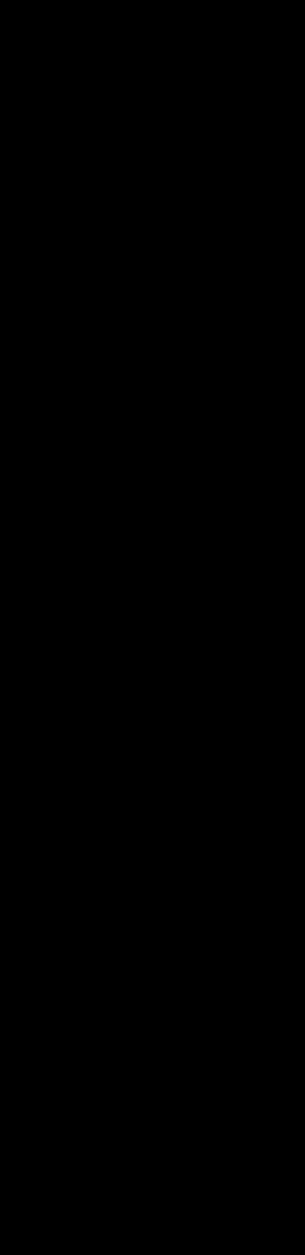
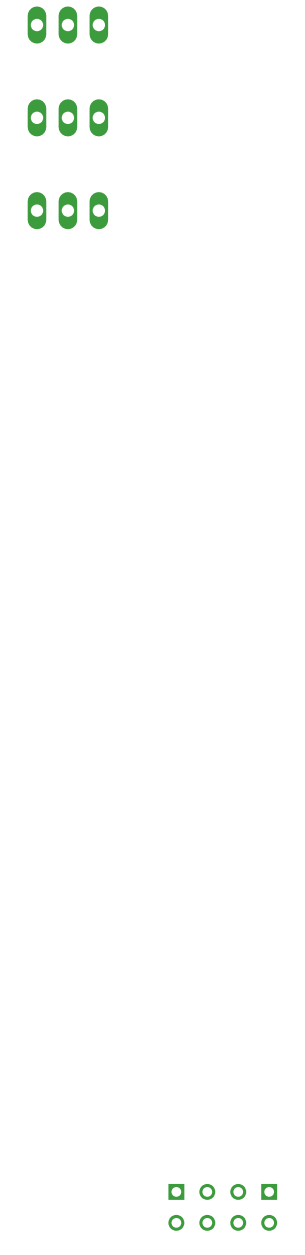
part: none -> (67, 25)
part: none -> (67, 117)
part: none -> (67, 210)
part: none -> (222, 1207)

